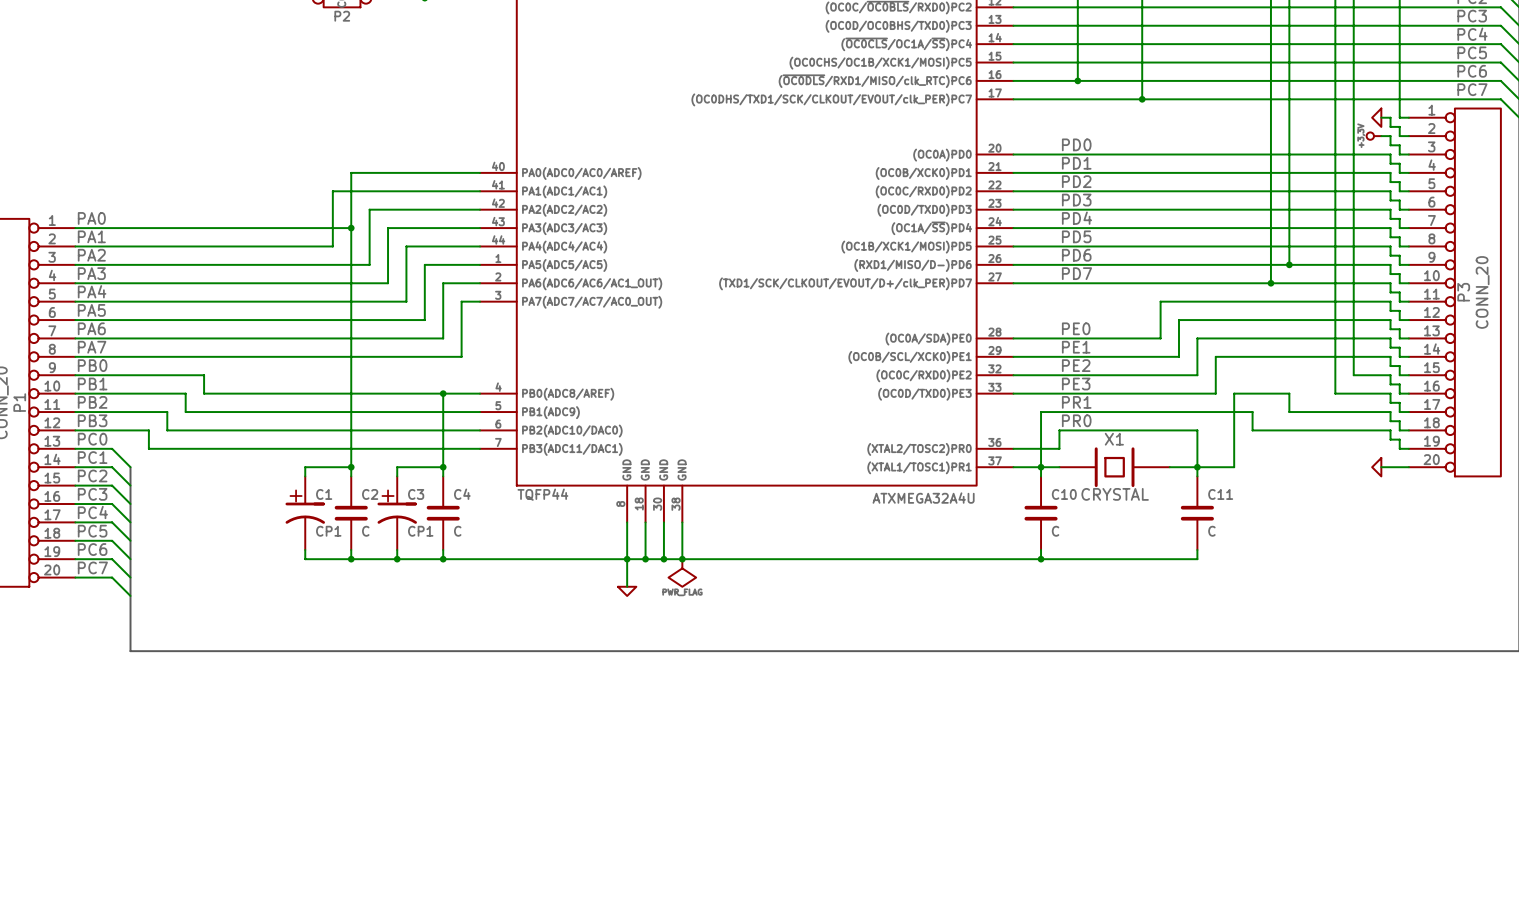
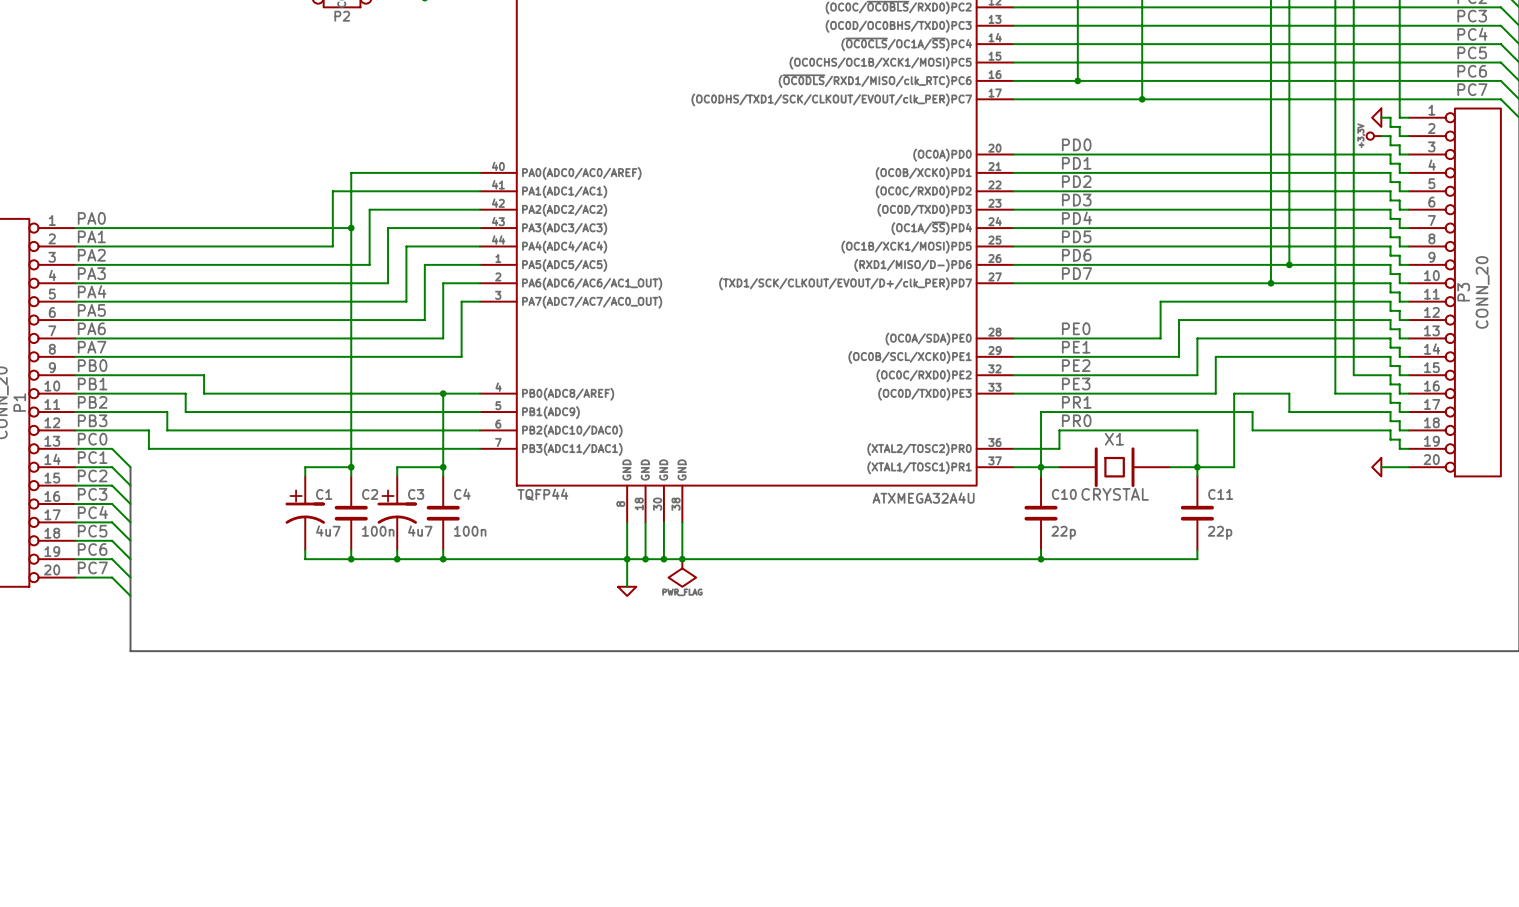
C1 value: CP1 (328, 531) -> 4u7 (328, 531)
C2 value: C (365, 531) -> 100n (378, 531)
C3 value: CP1 (420, 531) -> 4u7 (420, 531)
C4 value: C (457, 531) -> 100n (470, 531)
C10 value: C (1055, 531) -> 22p (1063, 532)
C11 value: C (1211, 531) -> 22p (1220, 532)

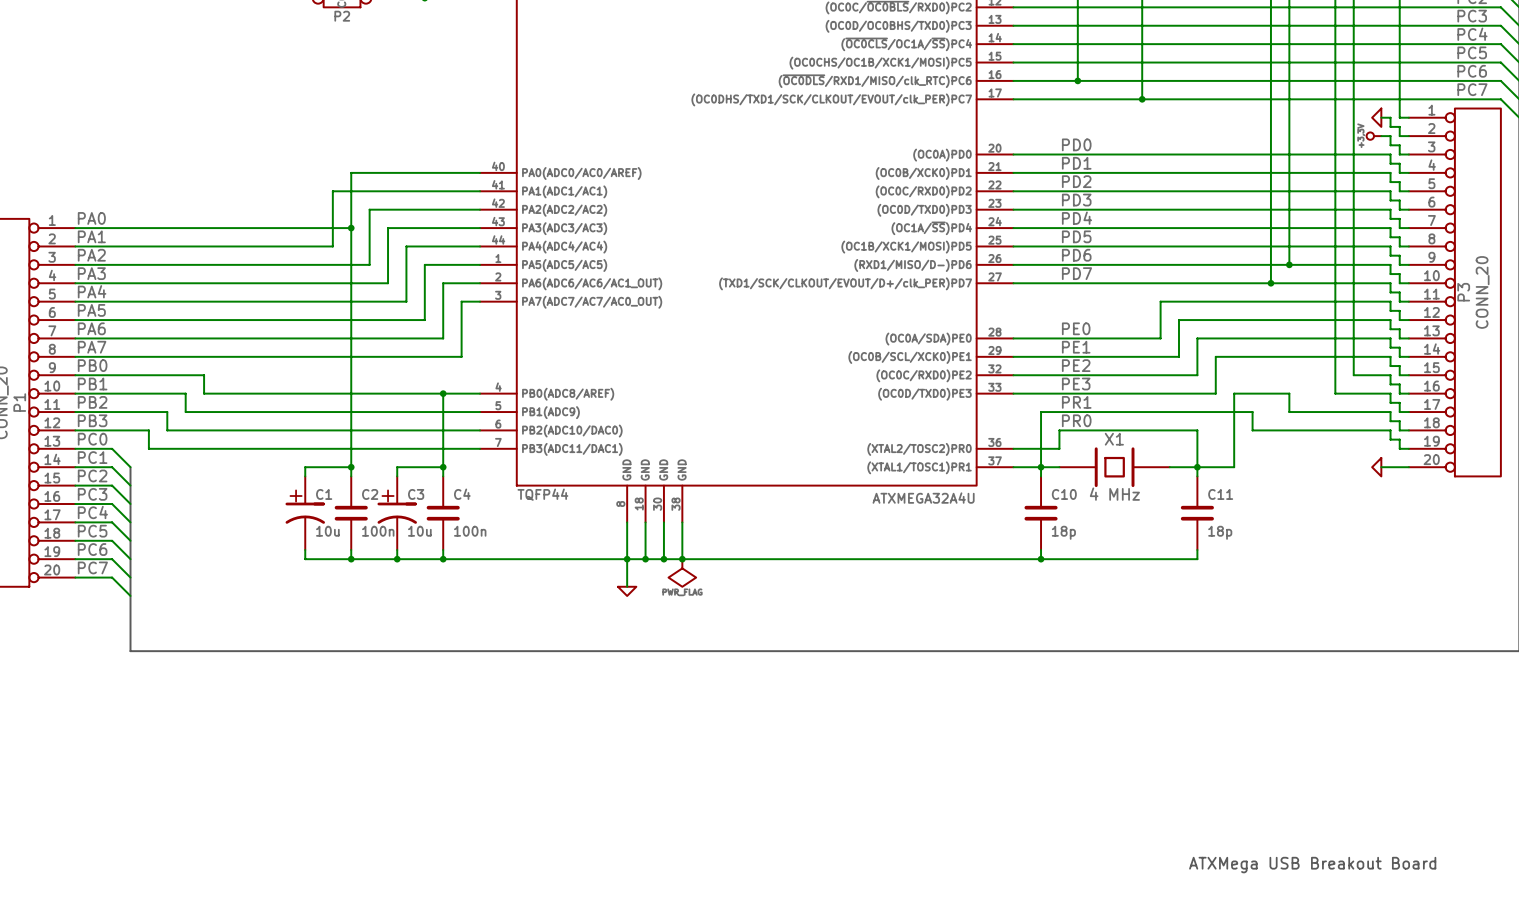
X1 value: CRYSTAL (1115, 494) -> 4 MHz (1114, 494)
C1 value: 4u7 (328, 531) -> 10u (327, 531)
C3 value: 4u7 (420, 531) -> 10u (419, 531)
C10 value: 22p (1063, 532) -> 18p (1063, 532)
C11 value: 22p (1220, 532) -> 18p (1220, 532)
text: none -> ATXMega USB Breakout Board (1312, 865)

